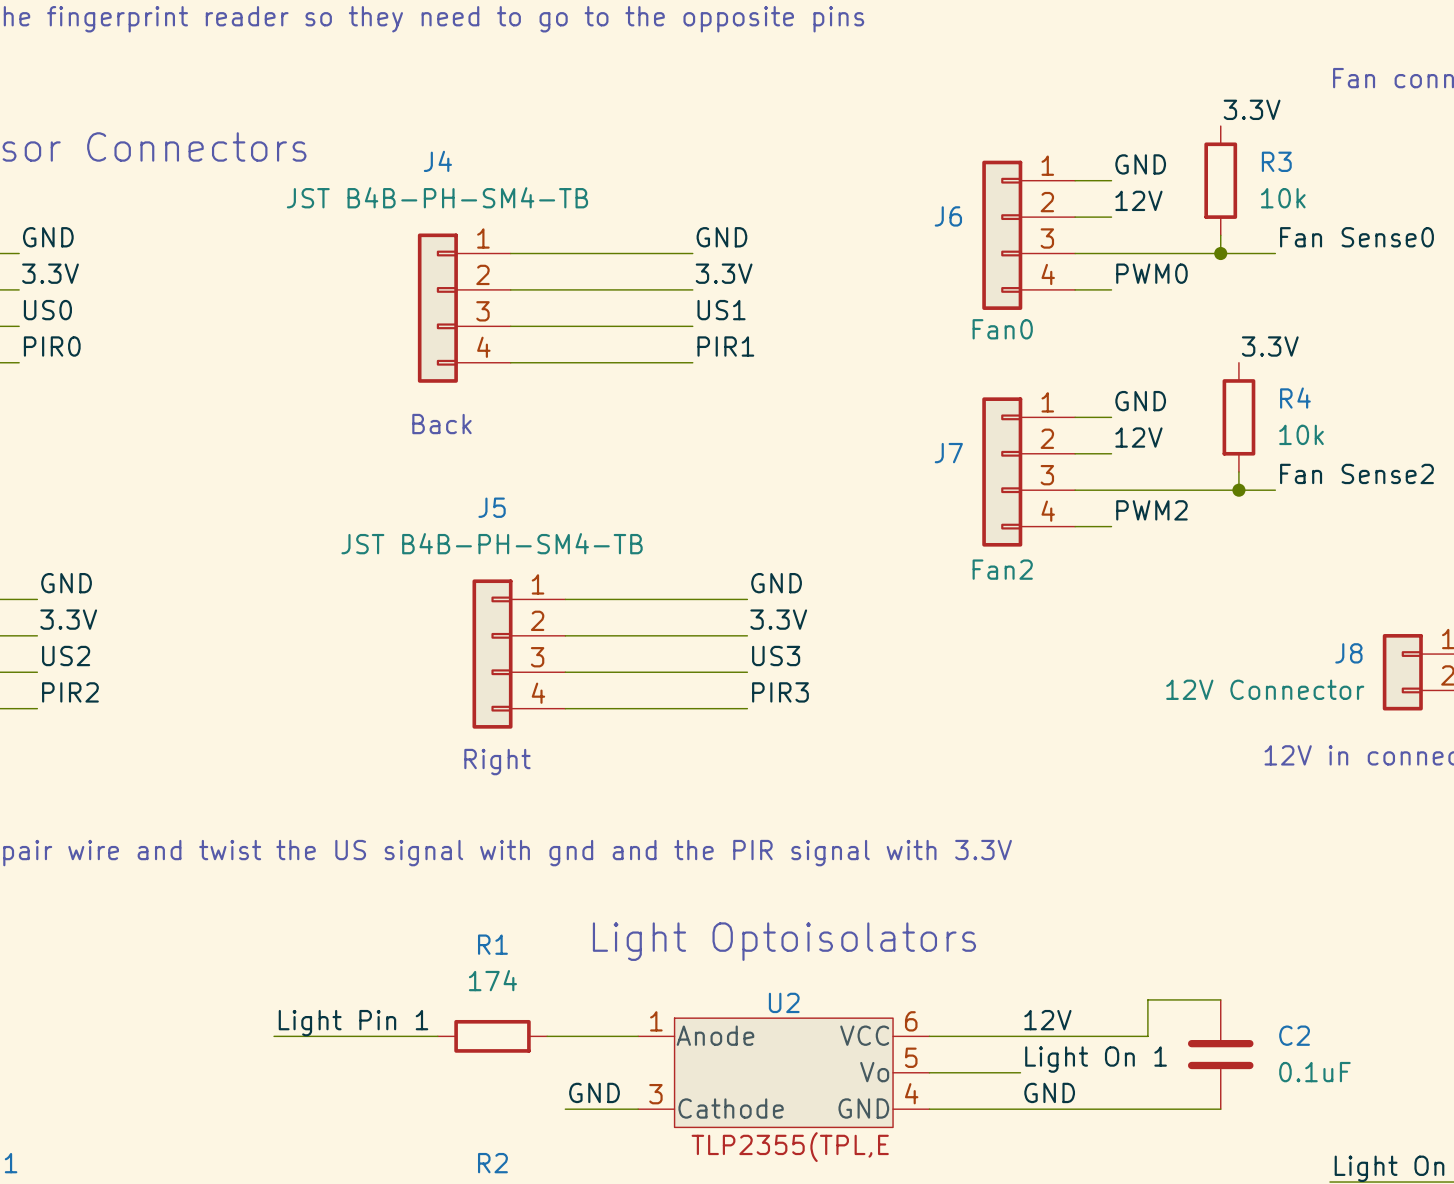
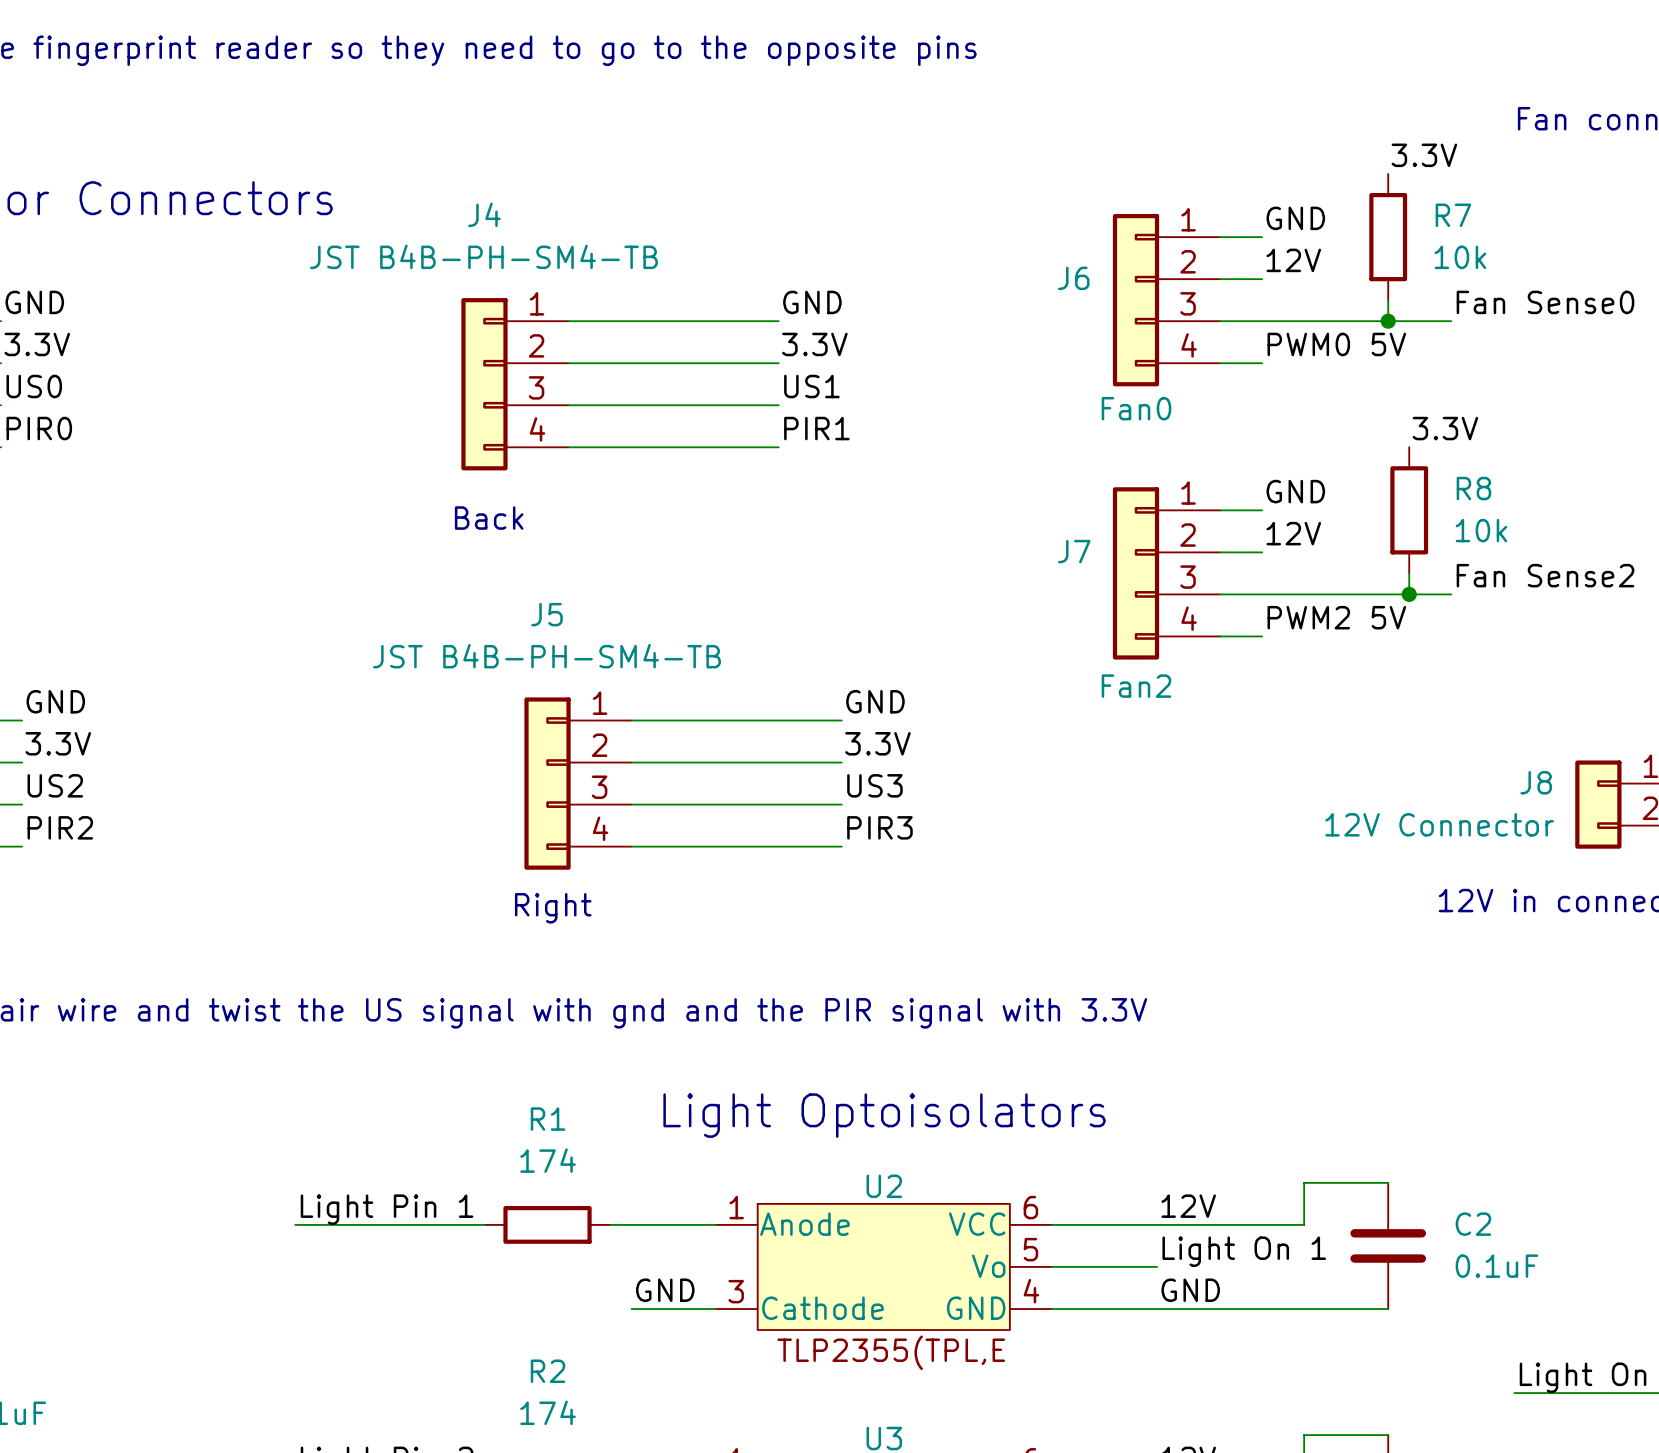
R3 name: R3 (1276, 161) -> R7 (1453, 215)
label: PWM0 (1151, 273) -> PWM0 5V (1336, 344)
R4 name: R4 (1295, 398) -> R8 (1473, 488)
label: PWM2 (1151, 510) -> PWM2 5V (1336, 617)

